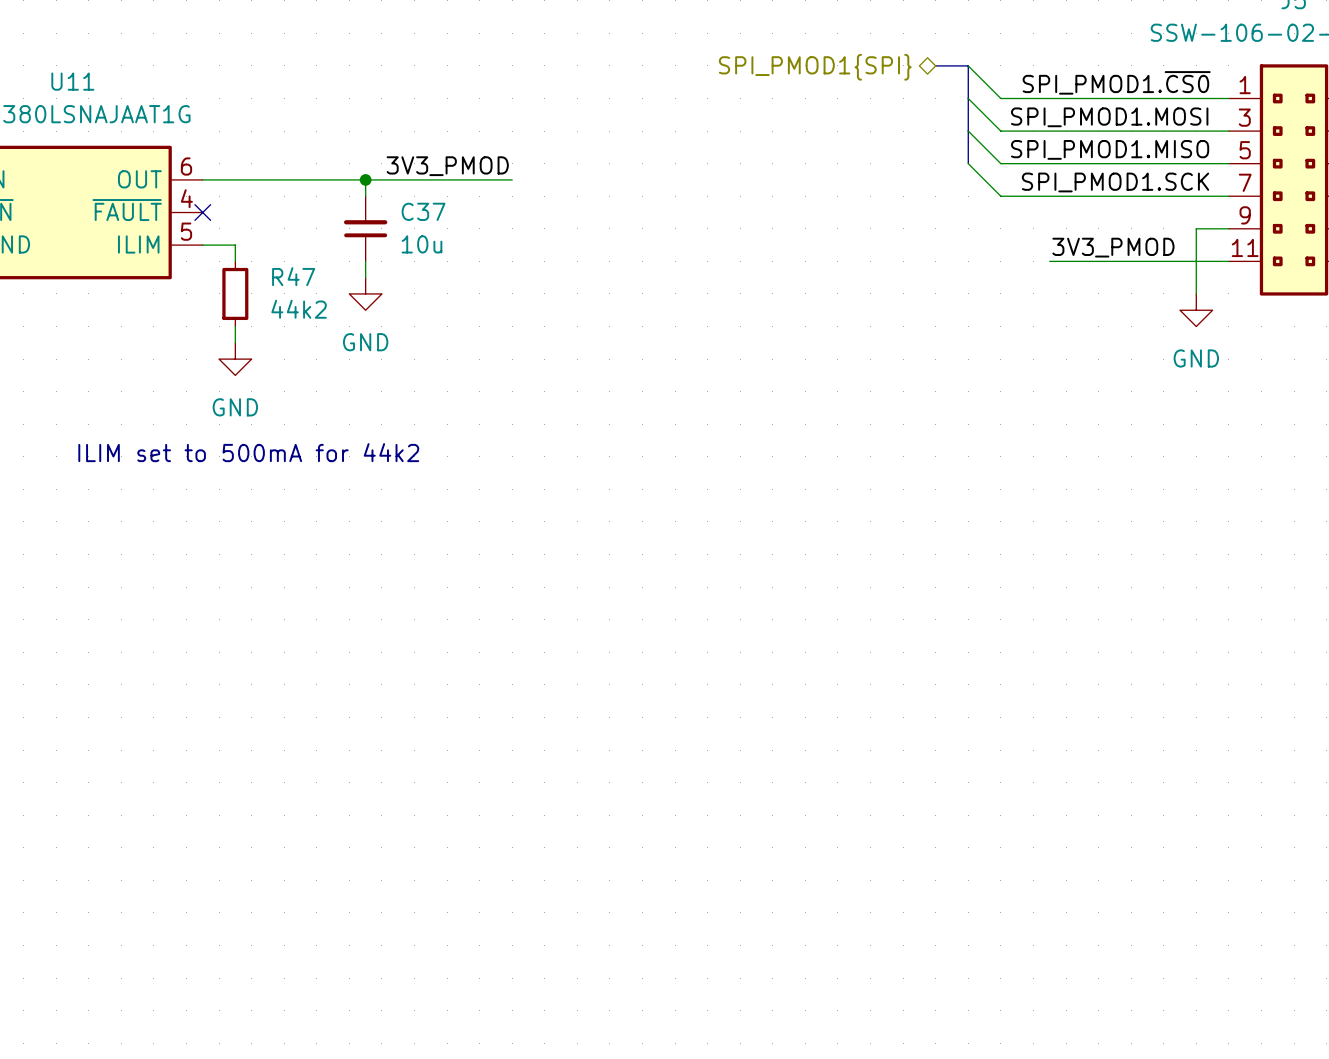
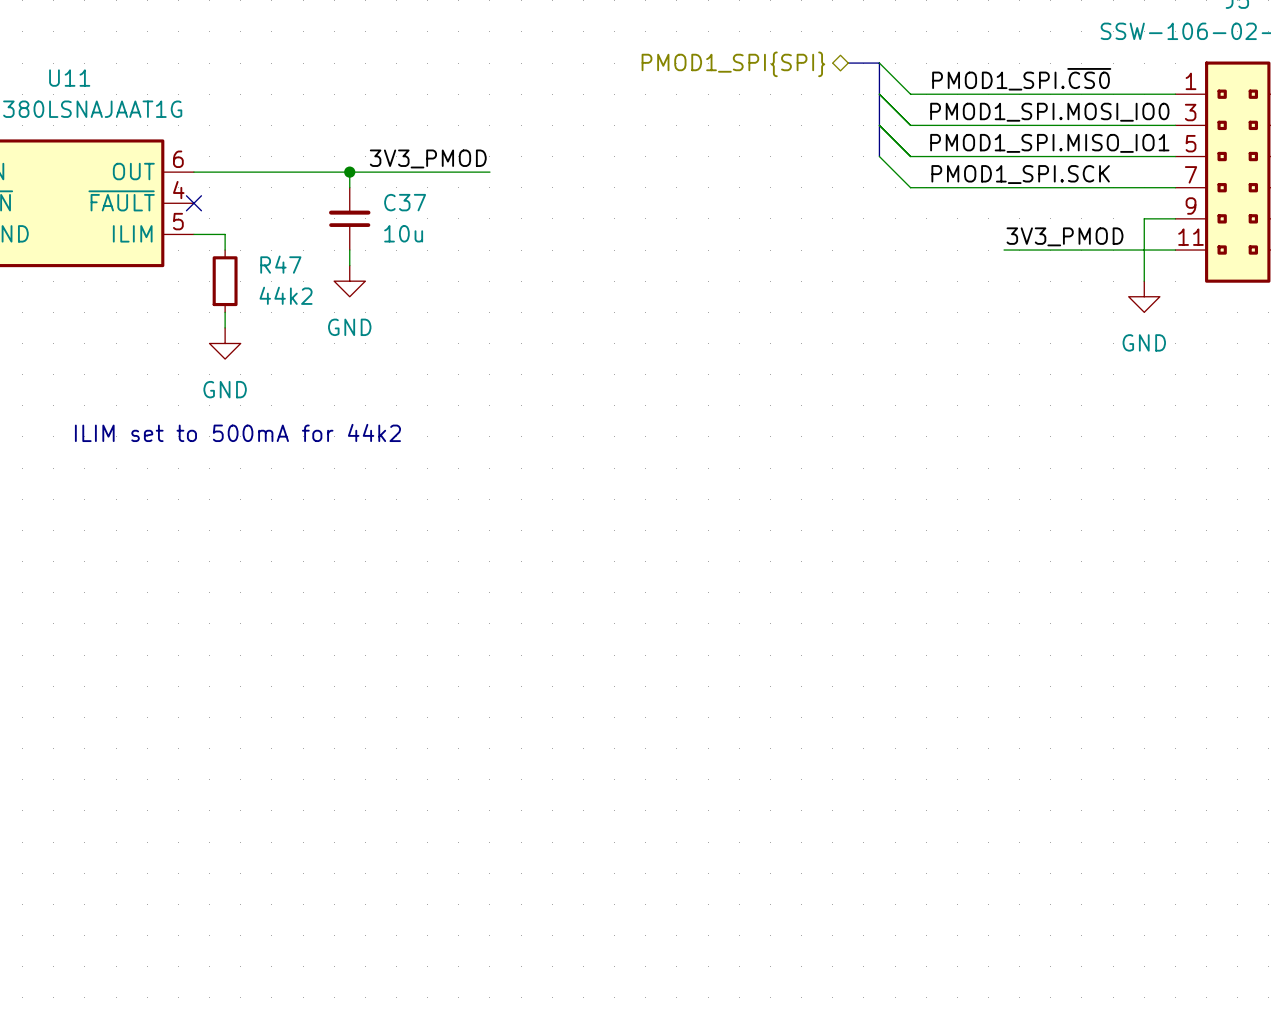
bus: (935, 65) (968, 65) (968, 163) -> (848, 63) (879, 63) (879, 156)
wire: (968, 65) (1000, 98) -> (879, 63) (910, 94) (957, 94)
hierarchical label: SPI_PMOD1{SPI} (815, 67) -> PMOD1_SPI{SPI} (733, 64)
label: SPI_PMOD1.~{CS0} (1116, 82) -> PMOD1_SPI.~{CS0} (1021, 79)
wire: (968, 98) (1000, 131) -> (879, 94) (910, 125) (957, 125)
label: SPI_PMOD1.MOSI (1109, 117) -> PMOD1_SPI.MOSI_IO0 (1049, 112)
wire: (968, 131) (1000, 163) -> (879, 125) (910, 156) (957, 156)
label: SPI_PMOD1.MISO (1110, 149) -> PMOD1_SPI.MISO_IO1 (1049, 143)
wire: (968, 163) (1000, 196) -> (879, 156) (910, 187) (957, 187)
label: SPI_PMOD1.SCK (1115, 182) -> PMOD1_SPI.SCK (1020, 174)

